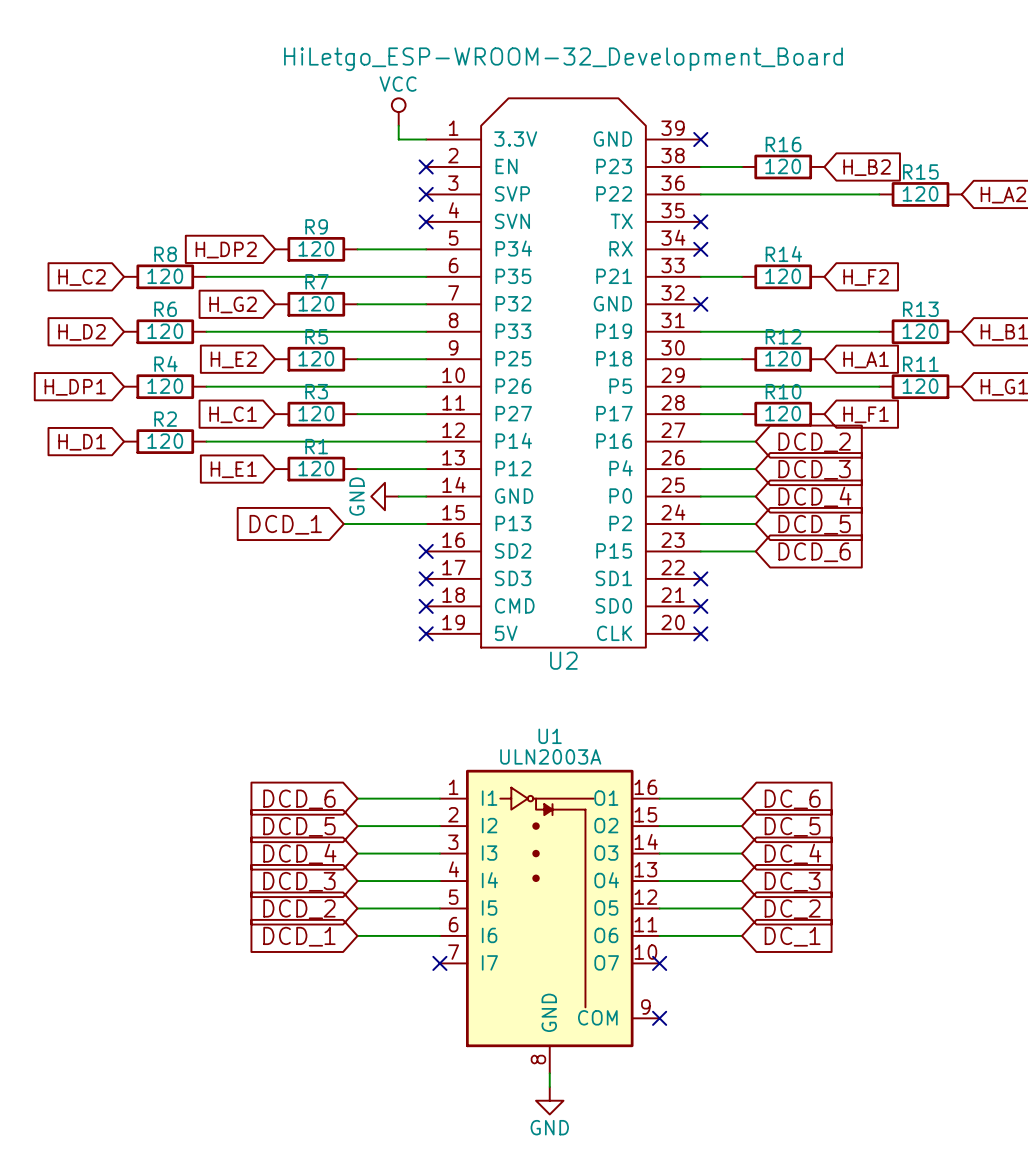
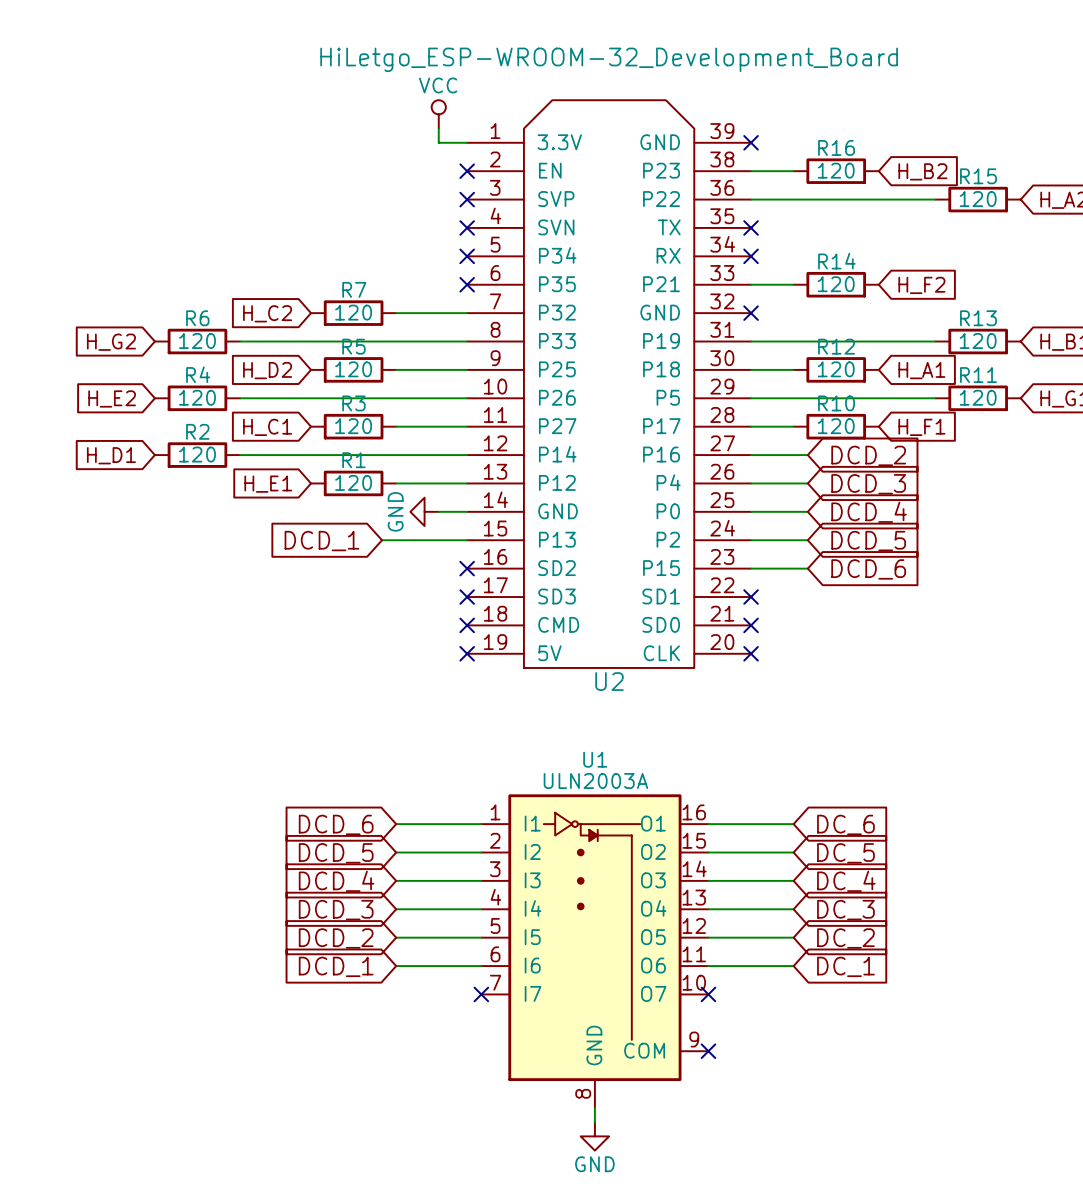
R9: 120 (316, 249) -> none
wire: (357, 249) (426, 249) -> none
no-connect mark: none -> (467, 256)
global label: H_DP2 (226, 250) -> none
R8: 120 (165, 276) -> none
wire: (206, 276) (426, 276) -> none
no-connect mark: none -> (467, 284)
global label: H_C2 (82, 277) -> none
global label: H_G2 (233, 304) -> H_C2 (267, 313)
global label: H_D2 (82, 332) -> H_G2 (111, 342)
global label: H_E2 (233, 359) -> H_D2 (267, 370)
global label: H_DP1 (75, 387) -> H_E2 (112, 398)

